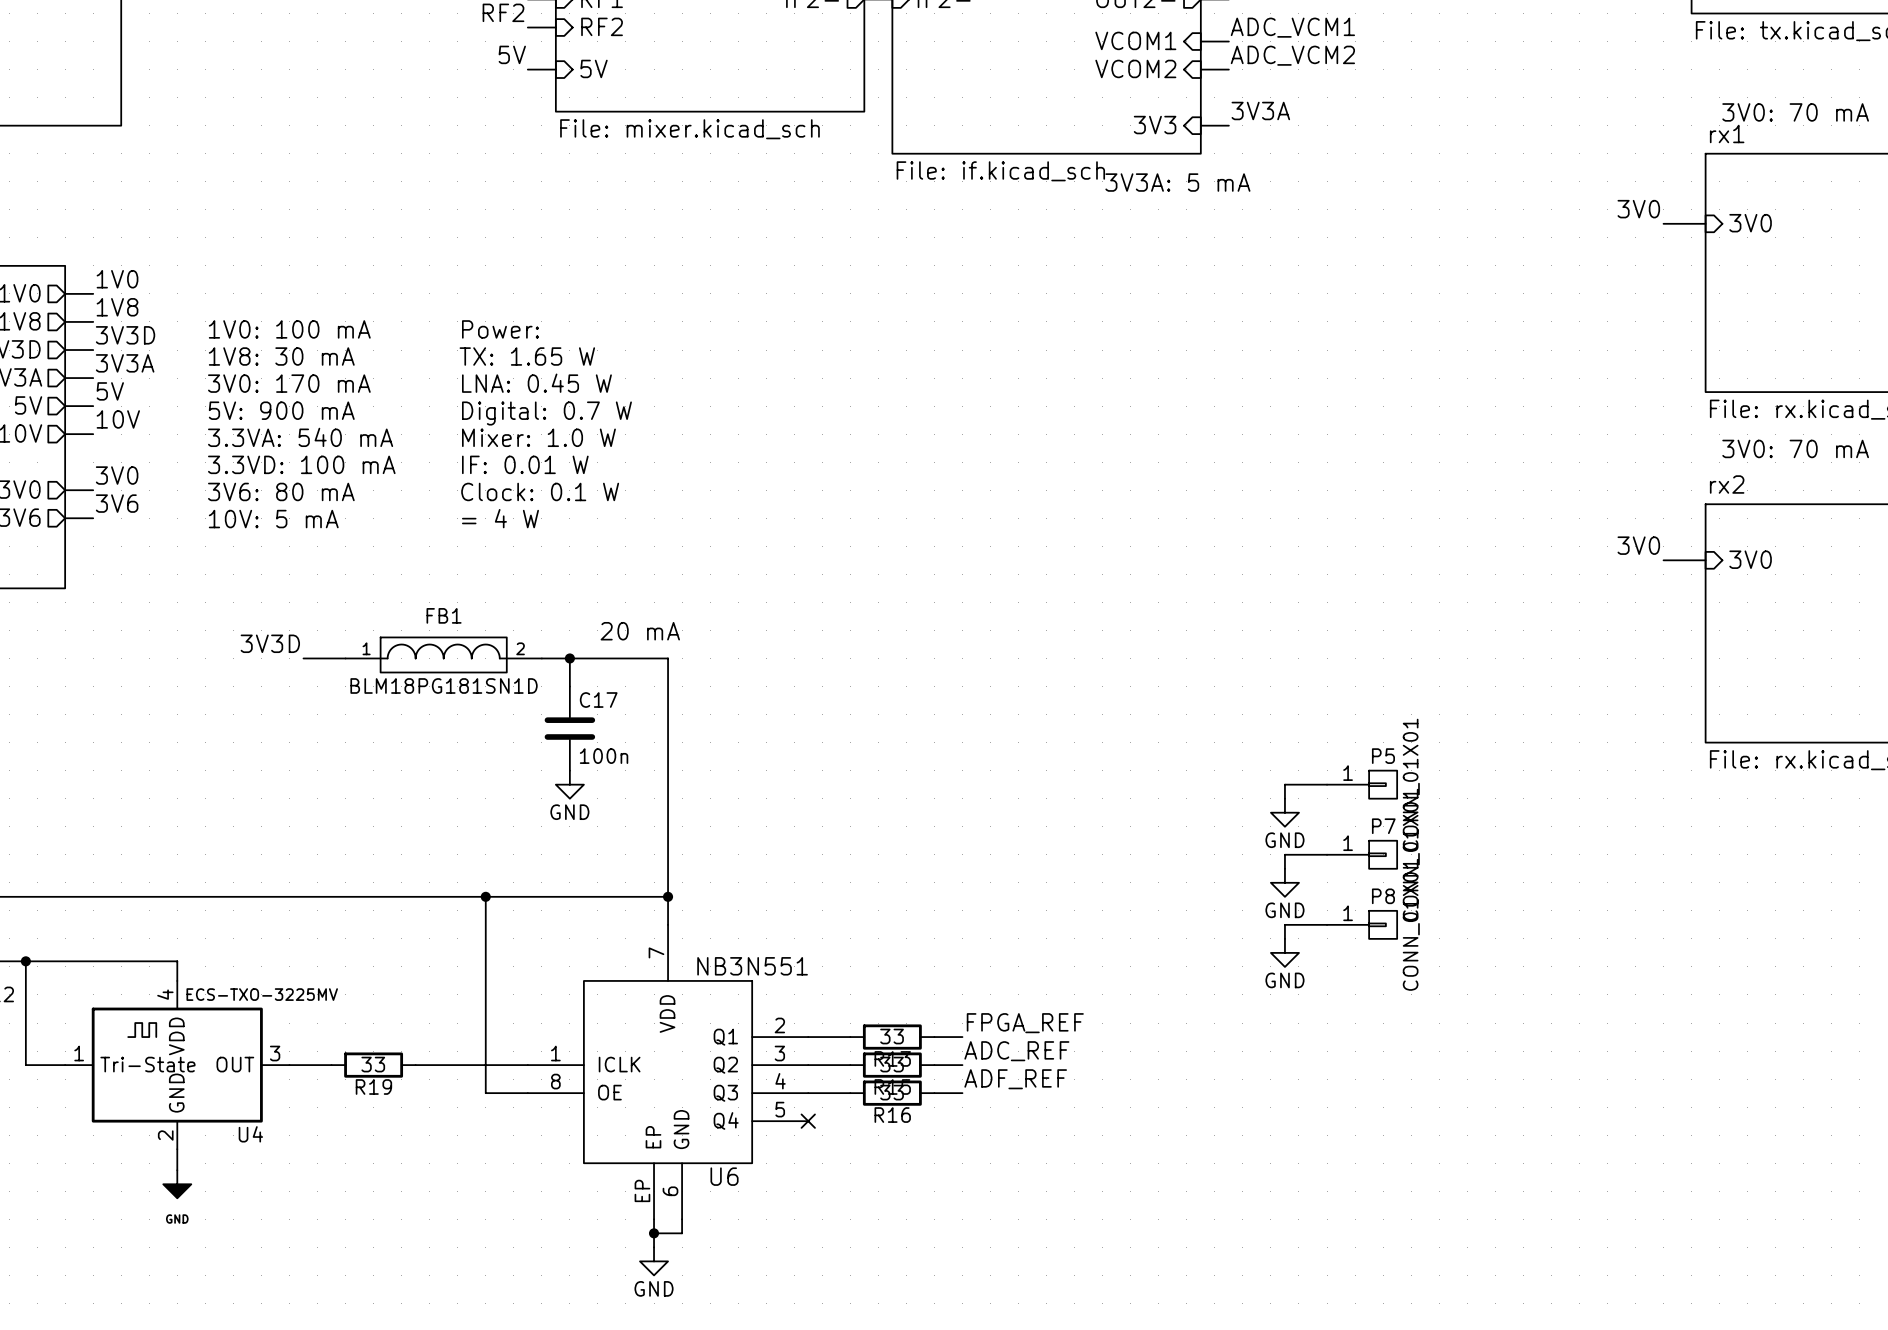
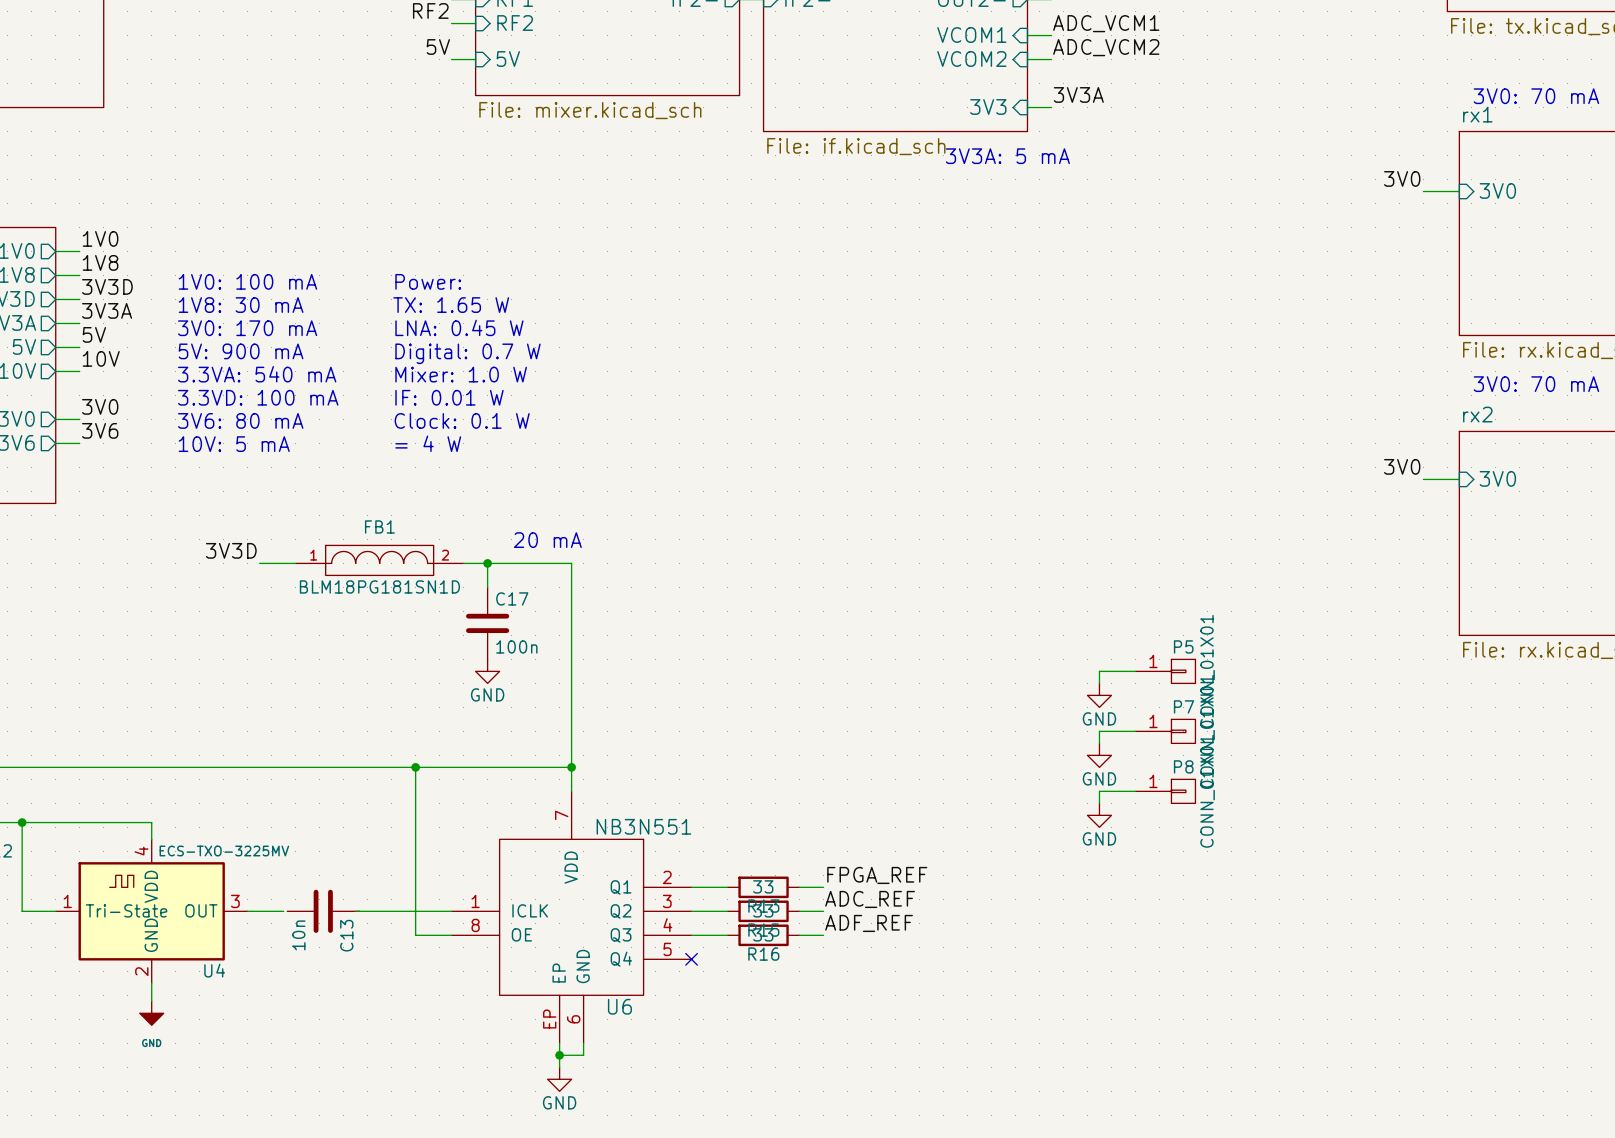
R19: 33 (373, 1065) -> none
C13: none -> 10n (323, 911)

